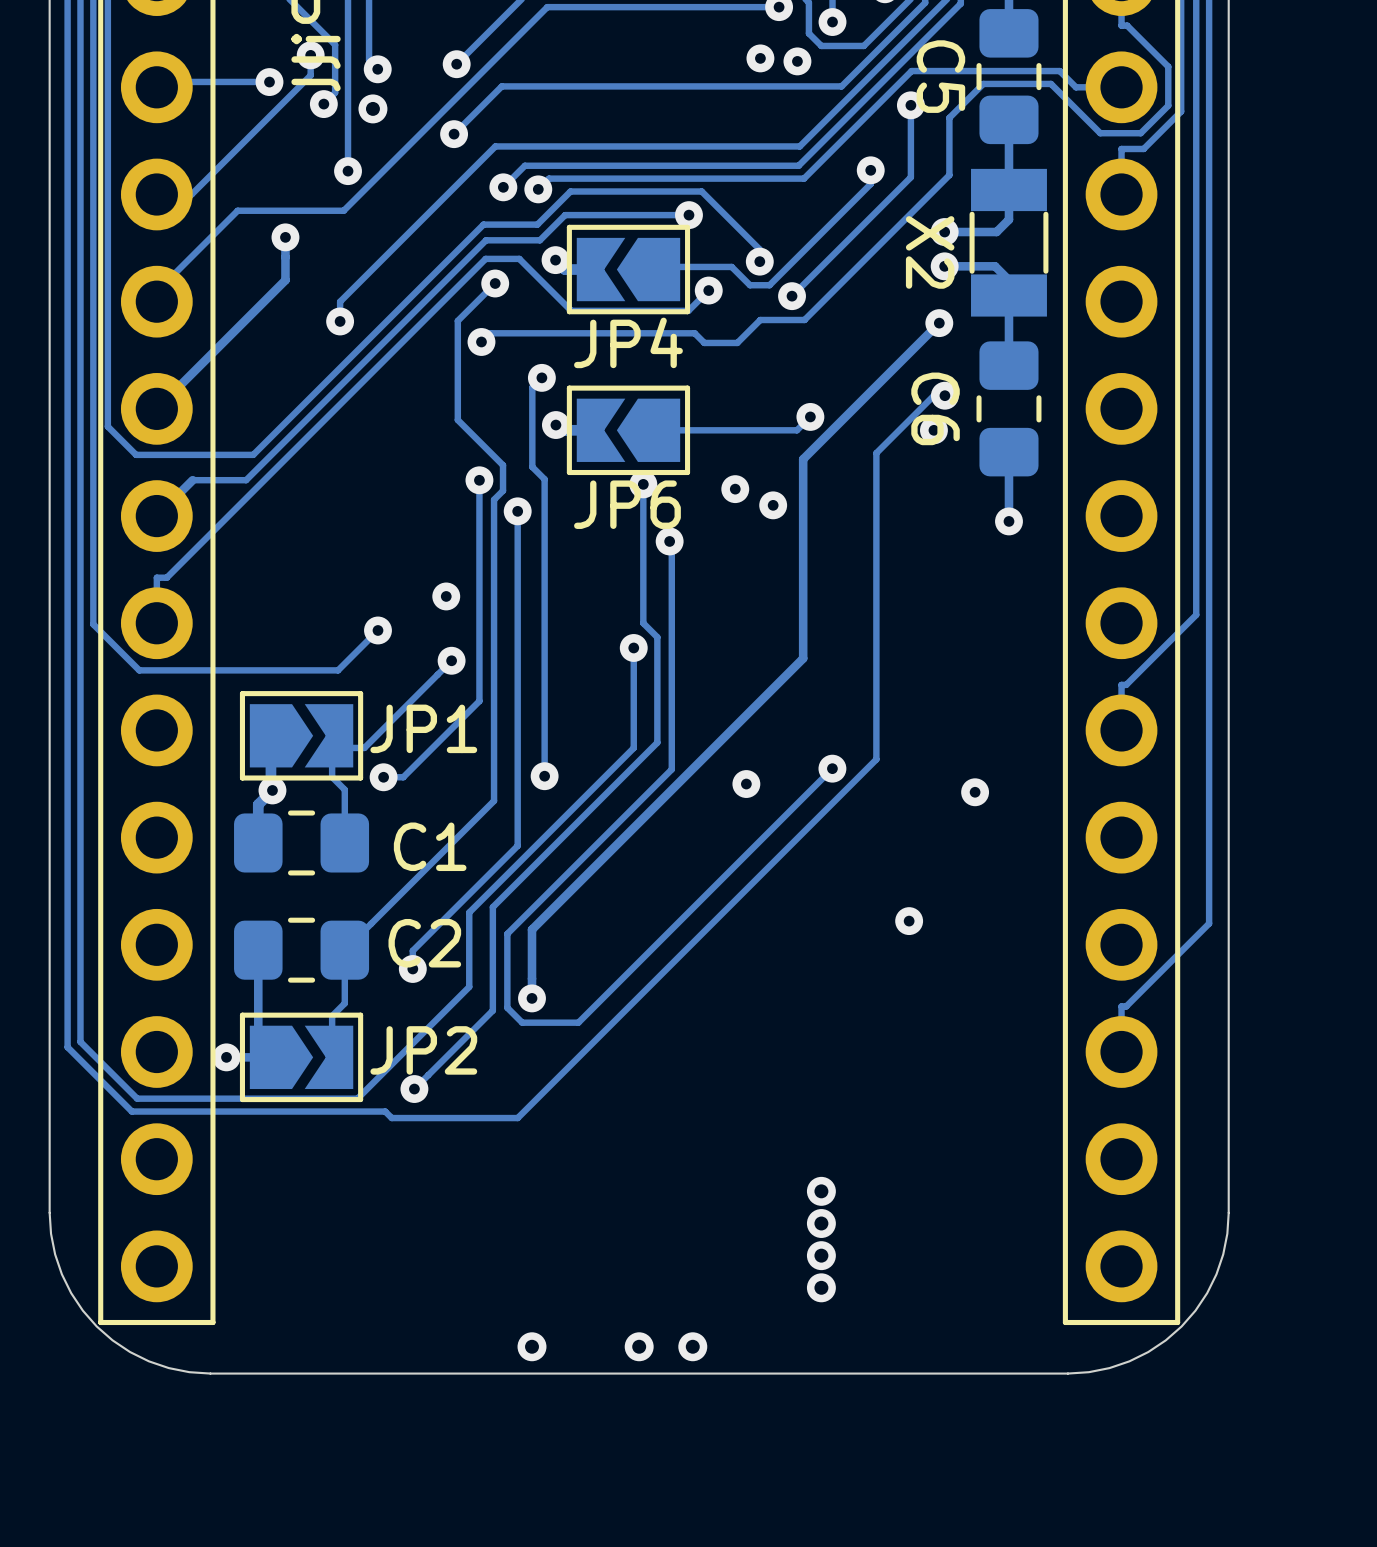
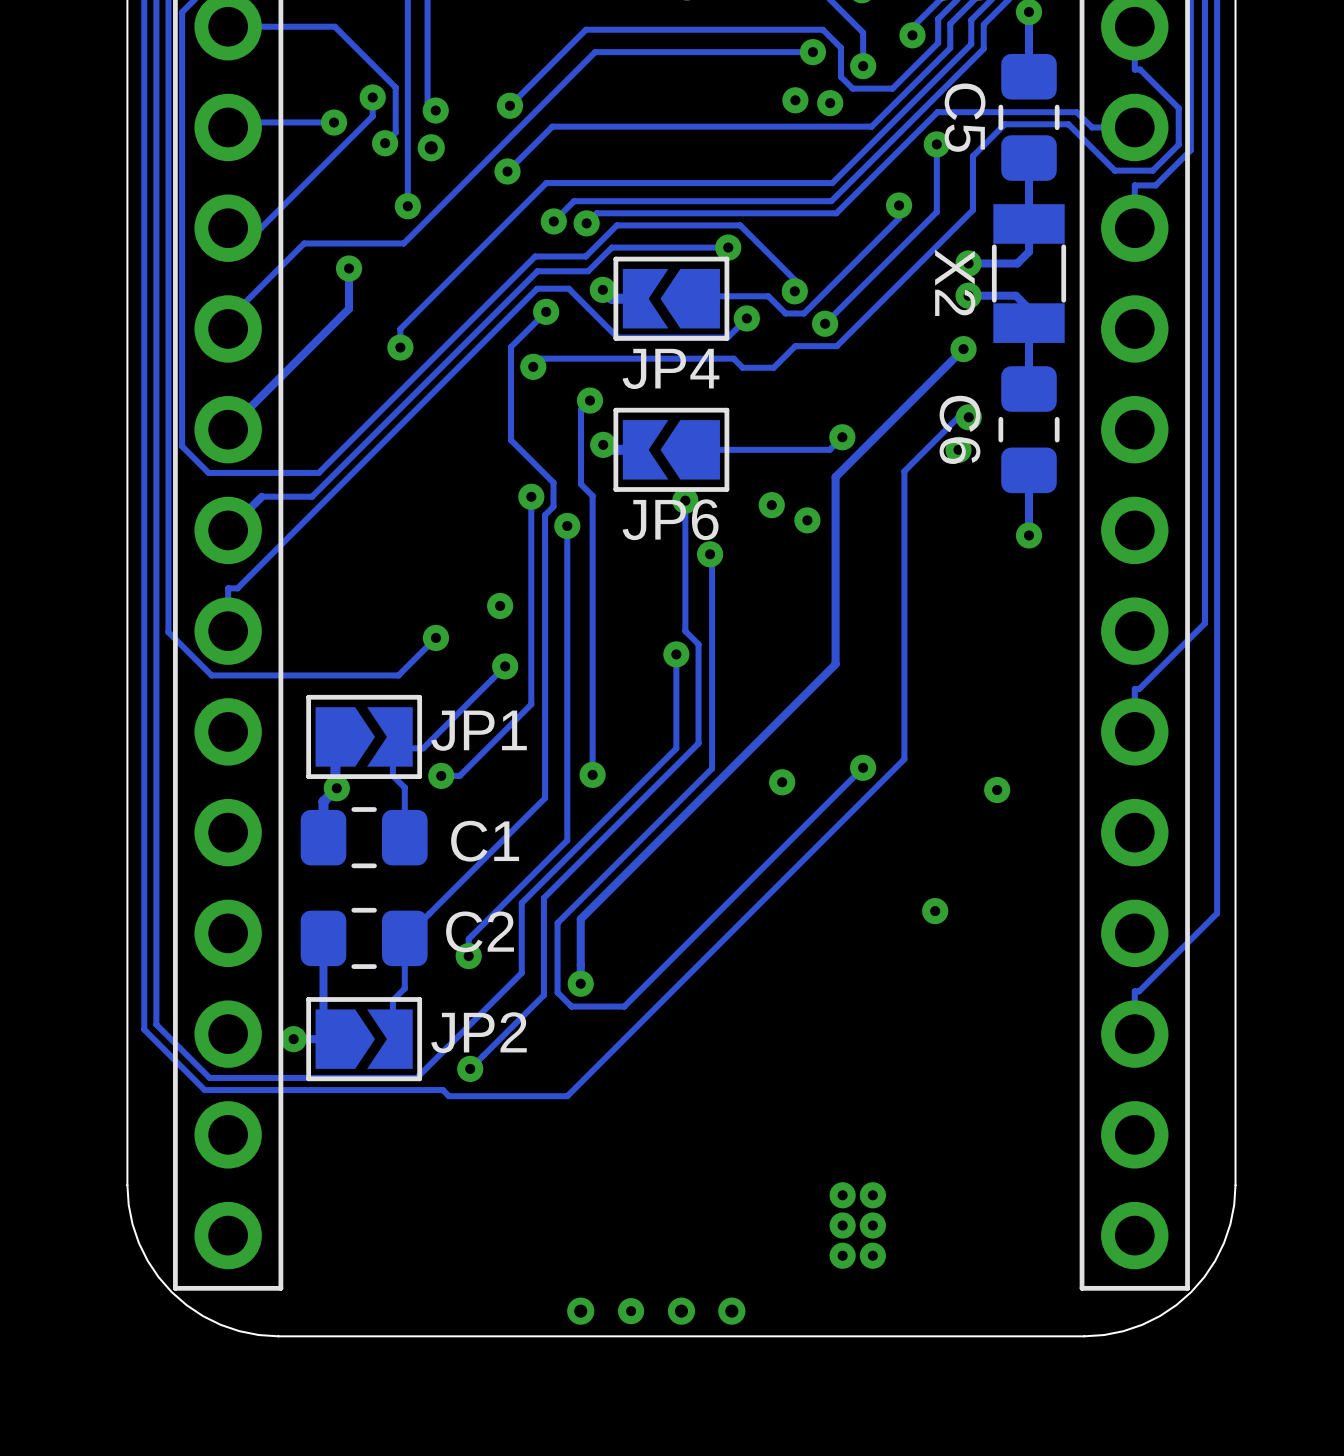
via: (821, 1191) -> none
via: none -> (842, 1195)
via: (821, 1223) -> none
via: none -> (872, 1195)
via: none -> (842, 1225)
via: (821, 1255) -> none
via: none -> (872, 1225)
via: none -> (842, 1255)
via: (821, 1287) -> none
via: none -> (872, 1255)
via: none -> (631, 1311)

